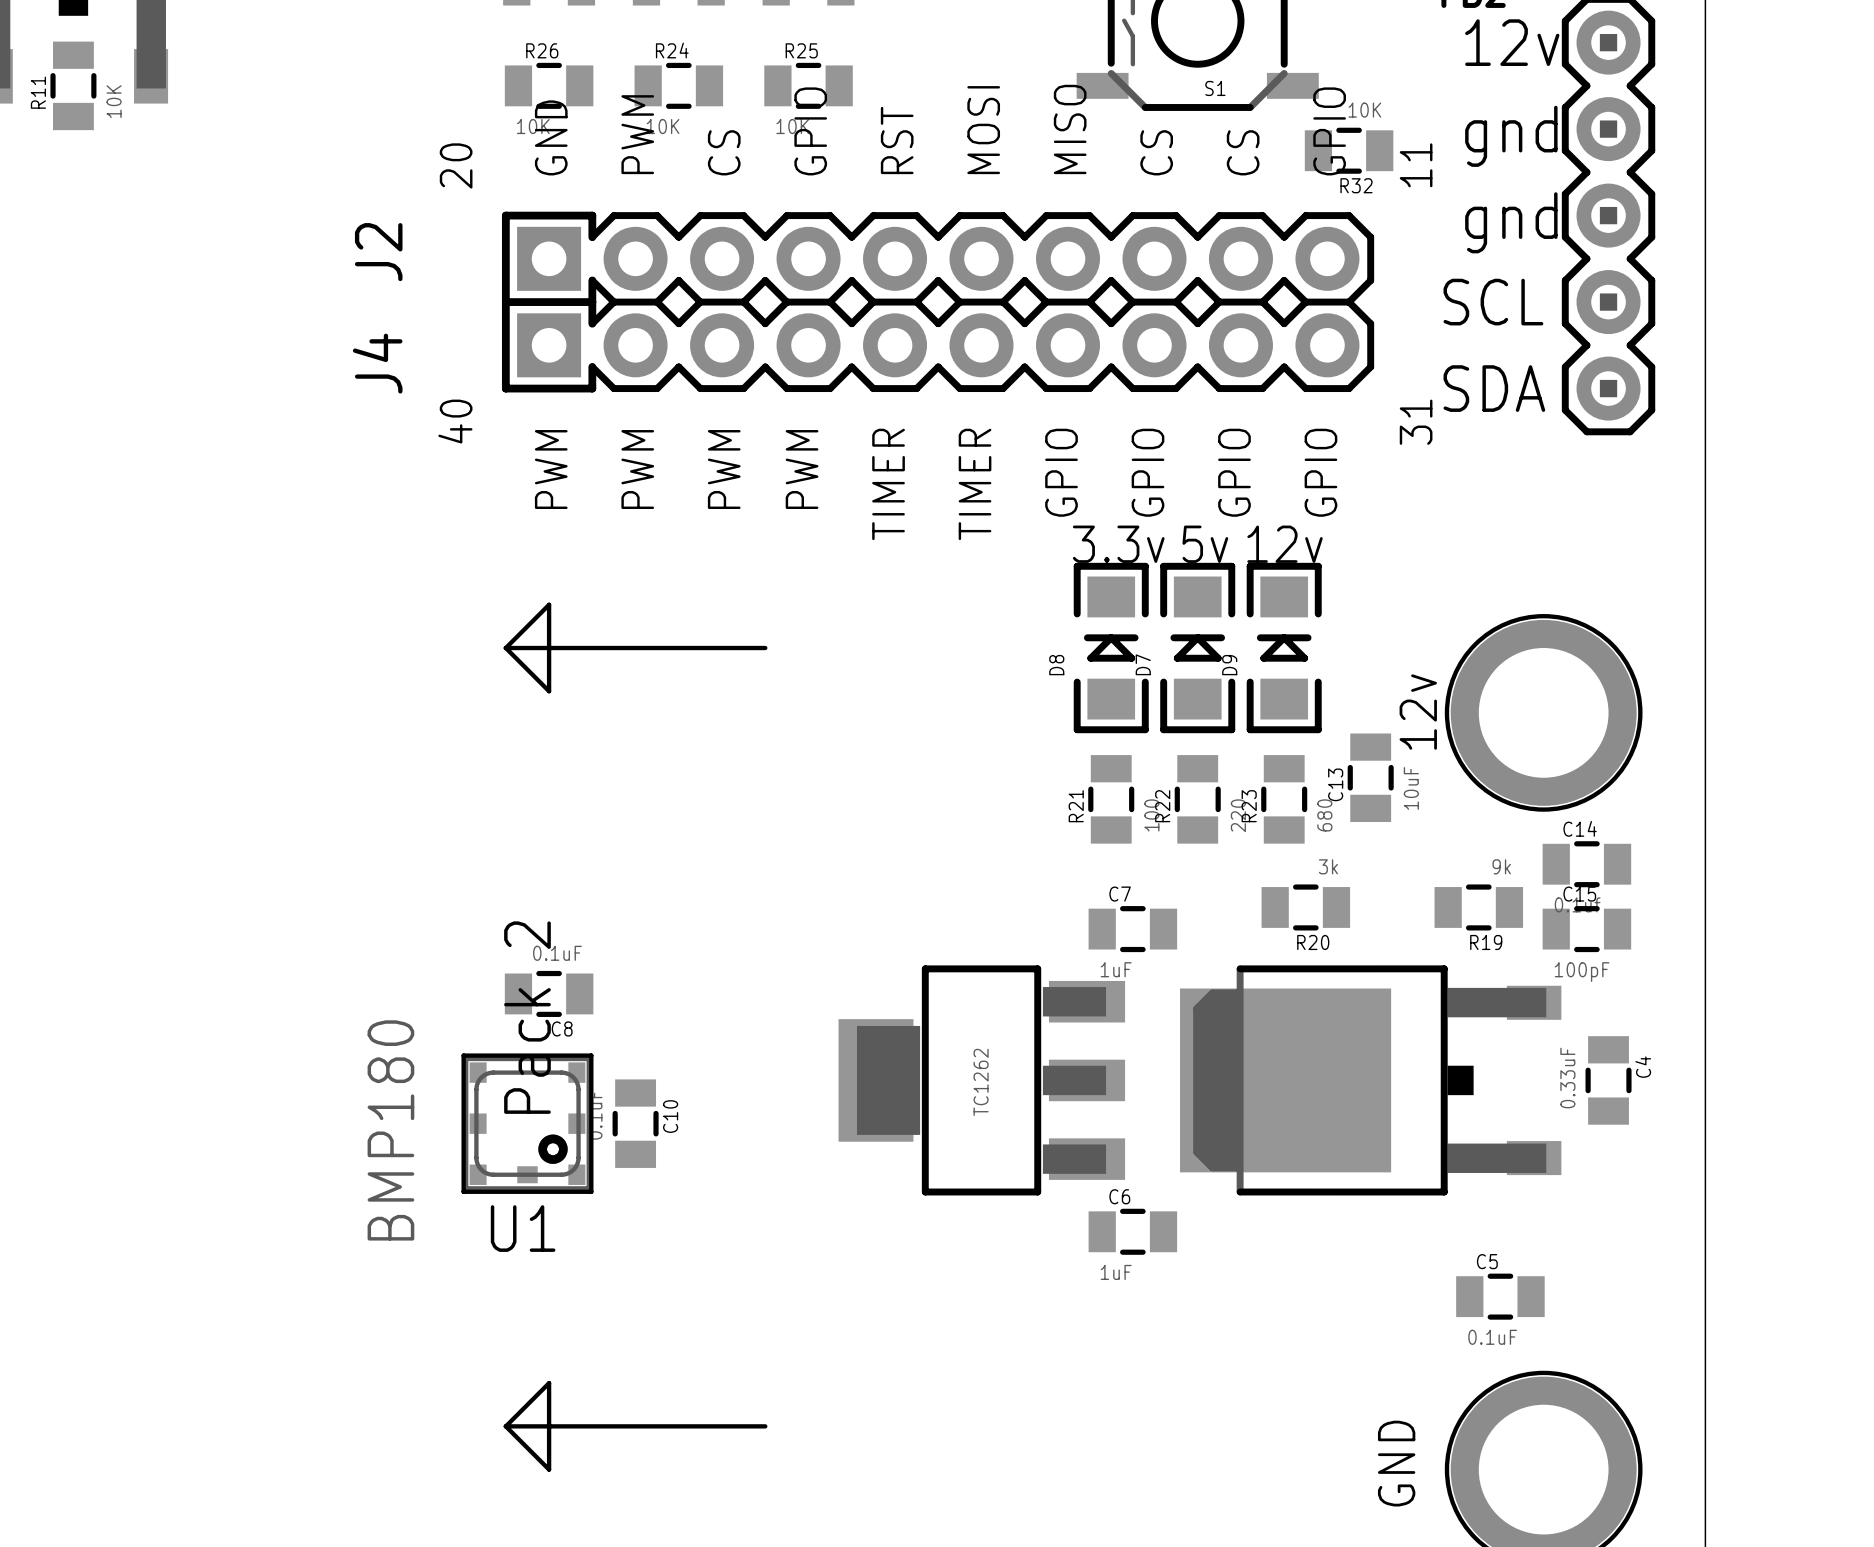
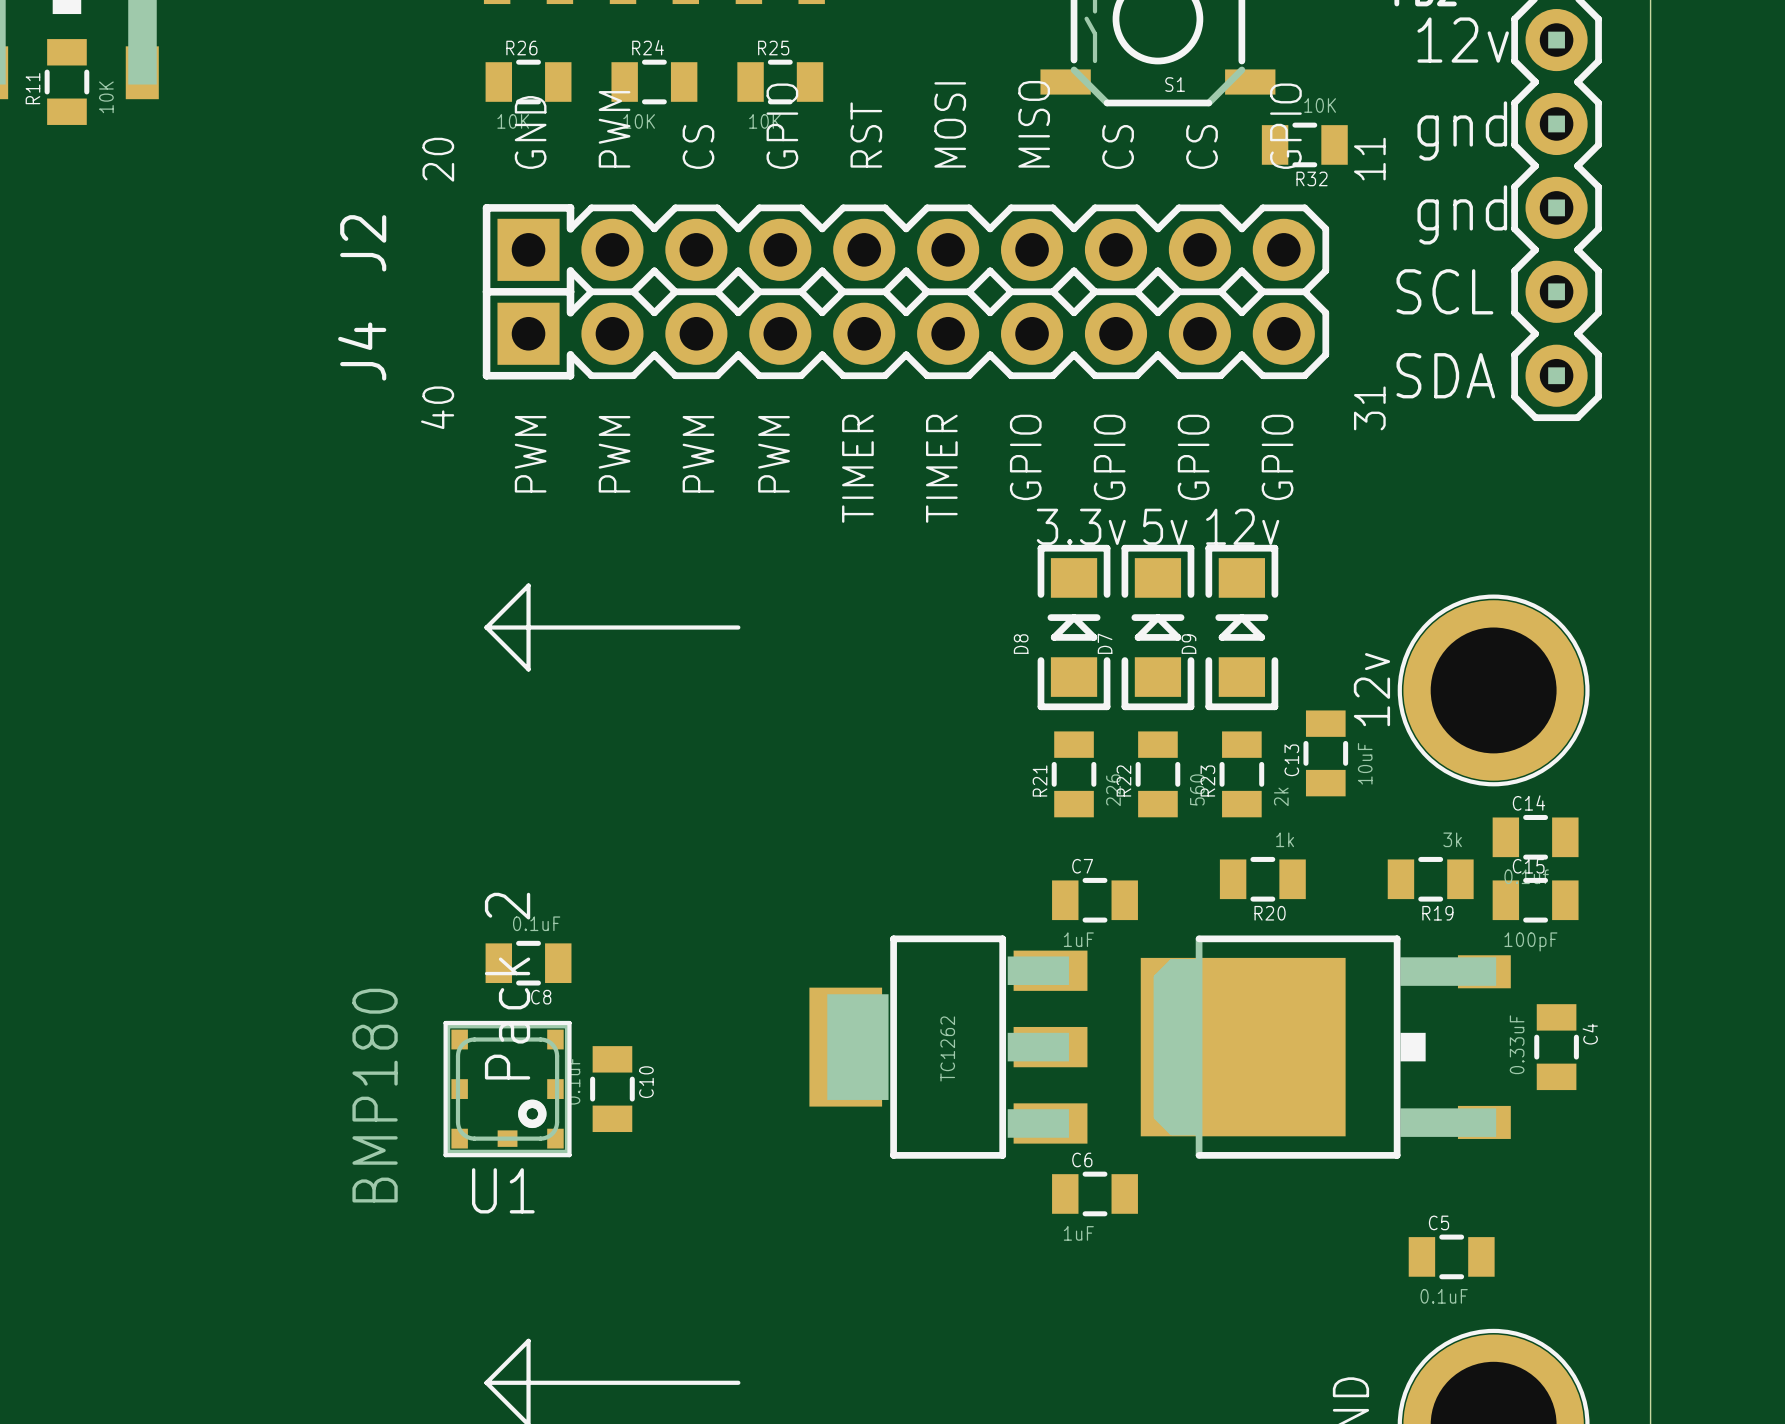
R21 value: 100 (1151, 815) -> 226 (1113, 790)
R22 value: 220 (1238, 815) -> 560 (1197, 789)
R23 value: 680 (1324, 815) -> 2k (1281, 796)
R20 value: 3k (1328, 866) -> 1k (1285, 839)
R19 value: 9k (1501, 866) -> 3k (1452, 839)

